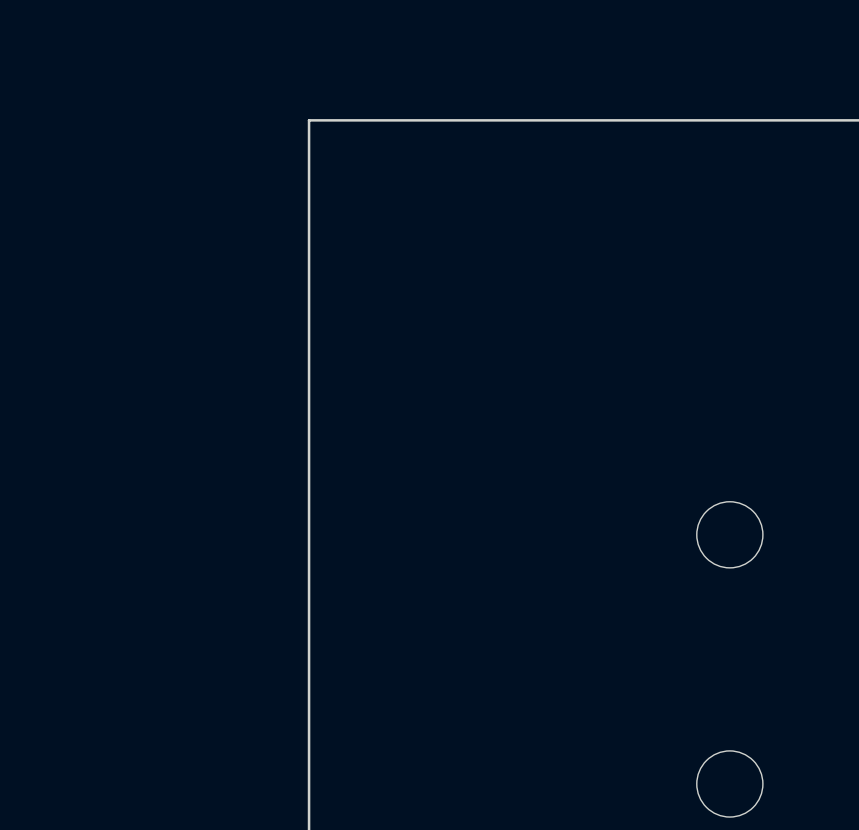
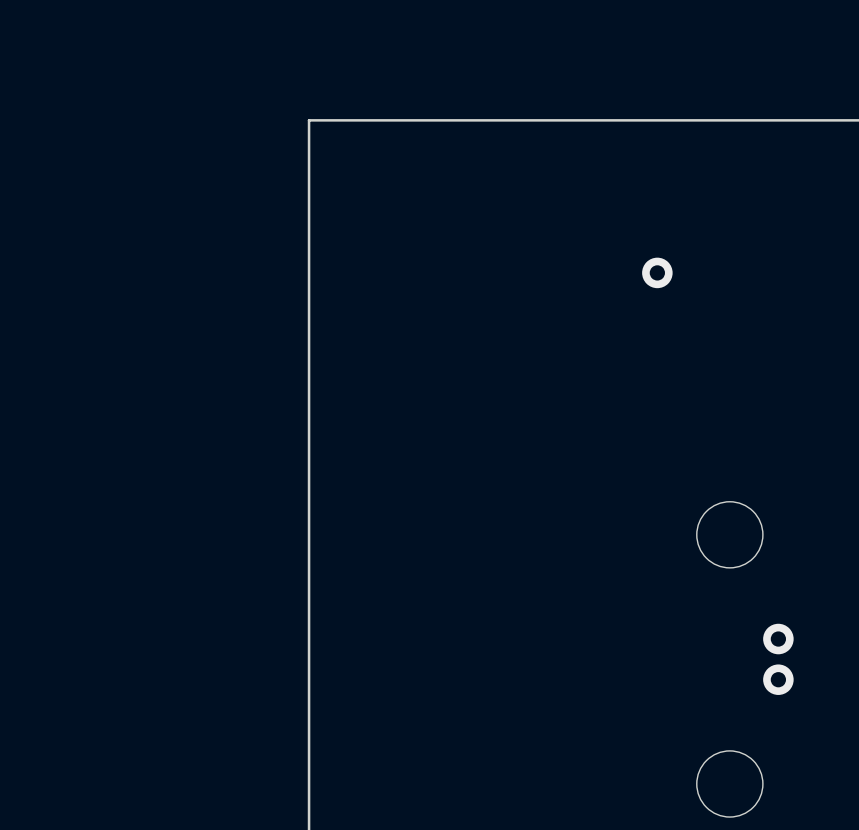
via: none -> (657, 272)
via: none -> (778, 639)
via: none -> (778, 679)

